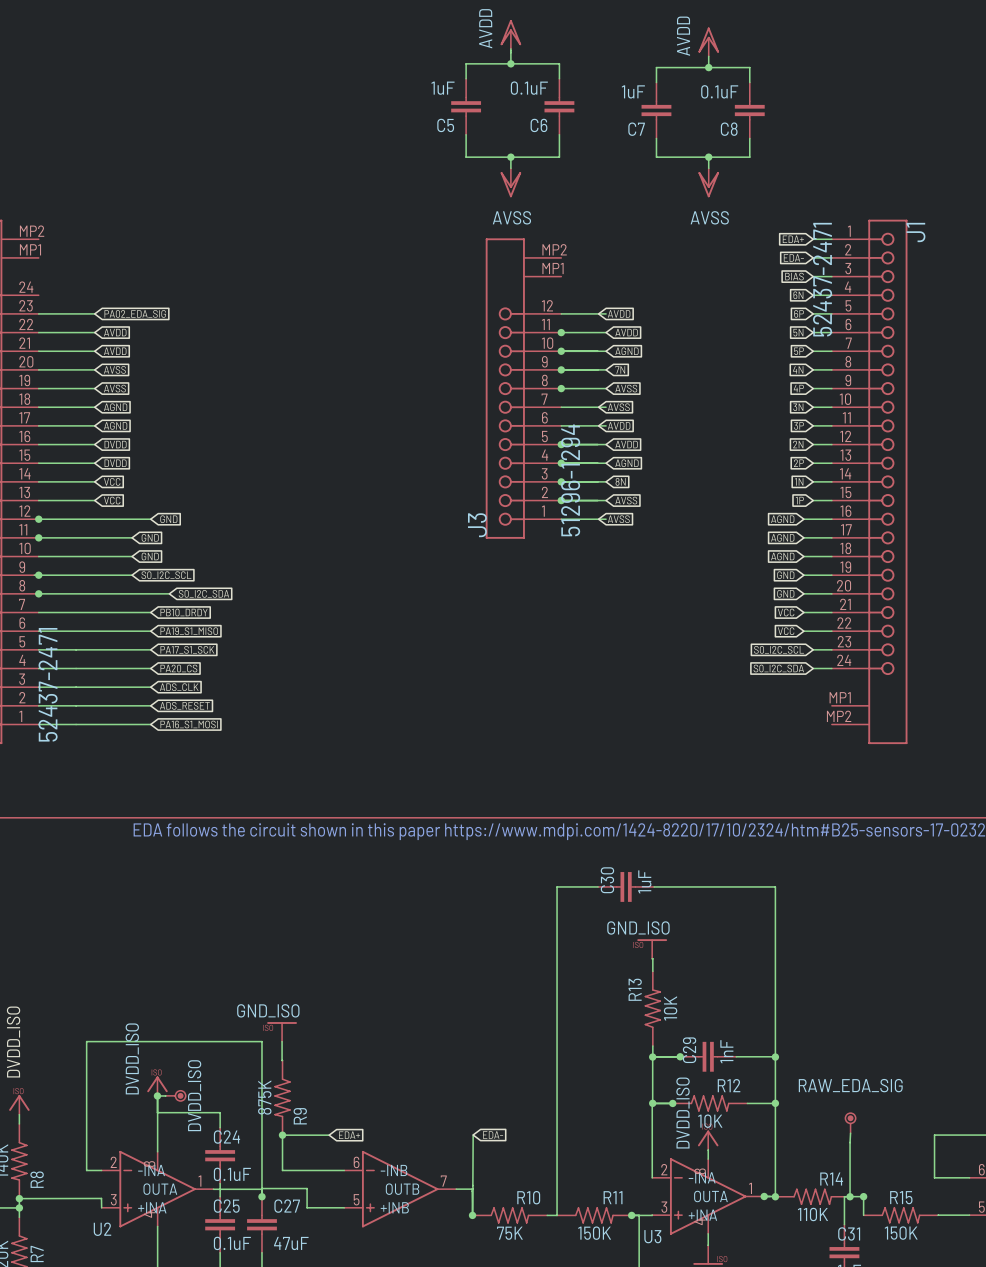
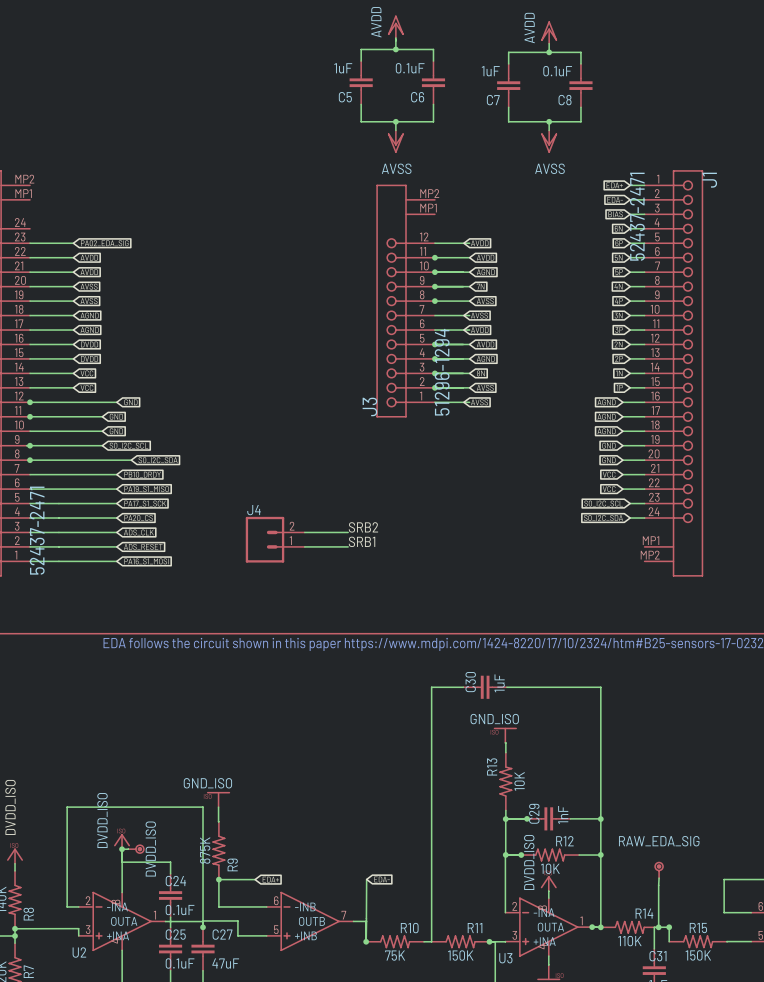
label: none -> SRB2 (363, 527)
wire: none -> (304, 532) (348, 532)
J4: none -> (275, 539)
label: none -> SRB1 (362, 541)
wire: none -> (304, 546) (348, 546)

